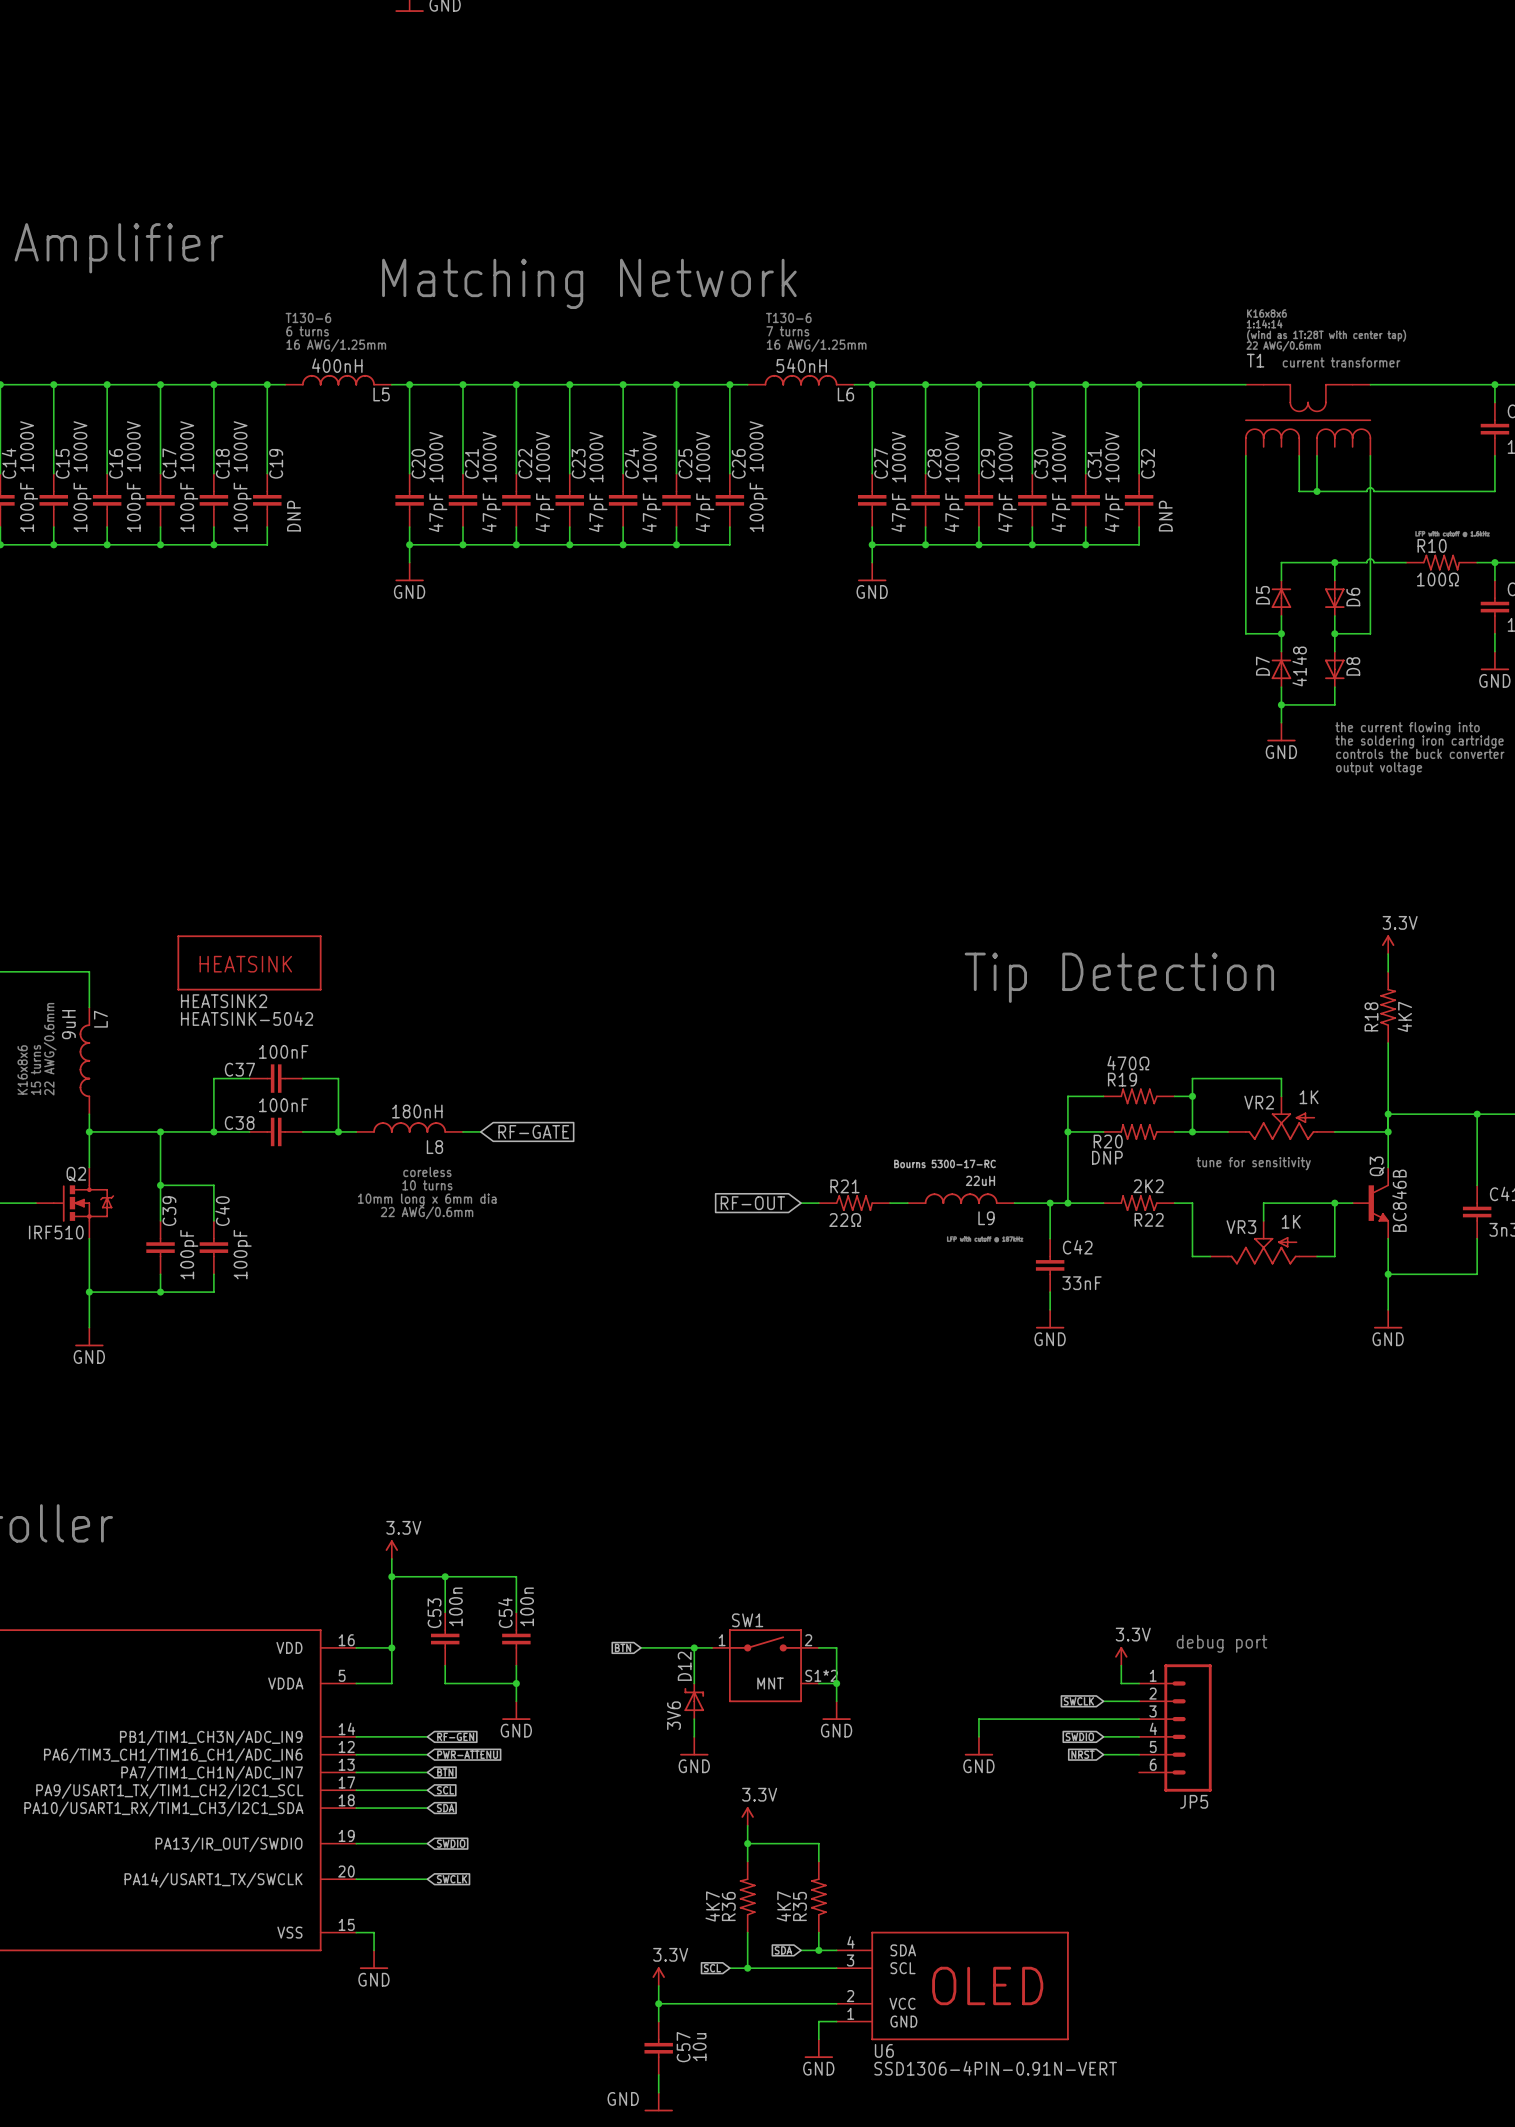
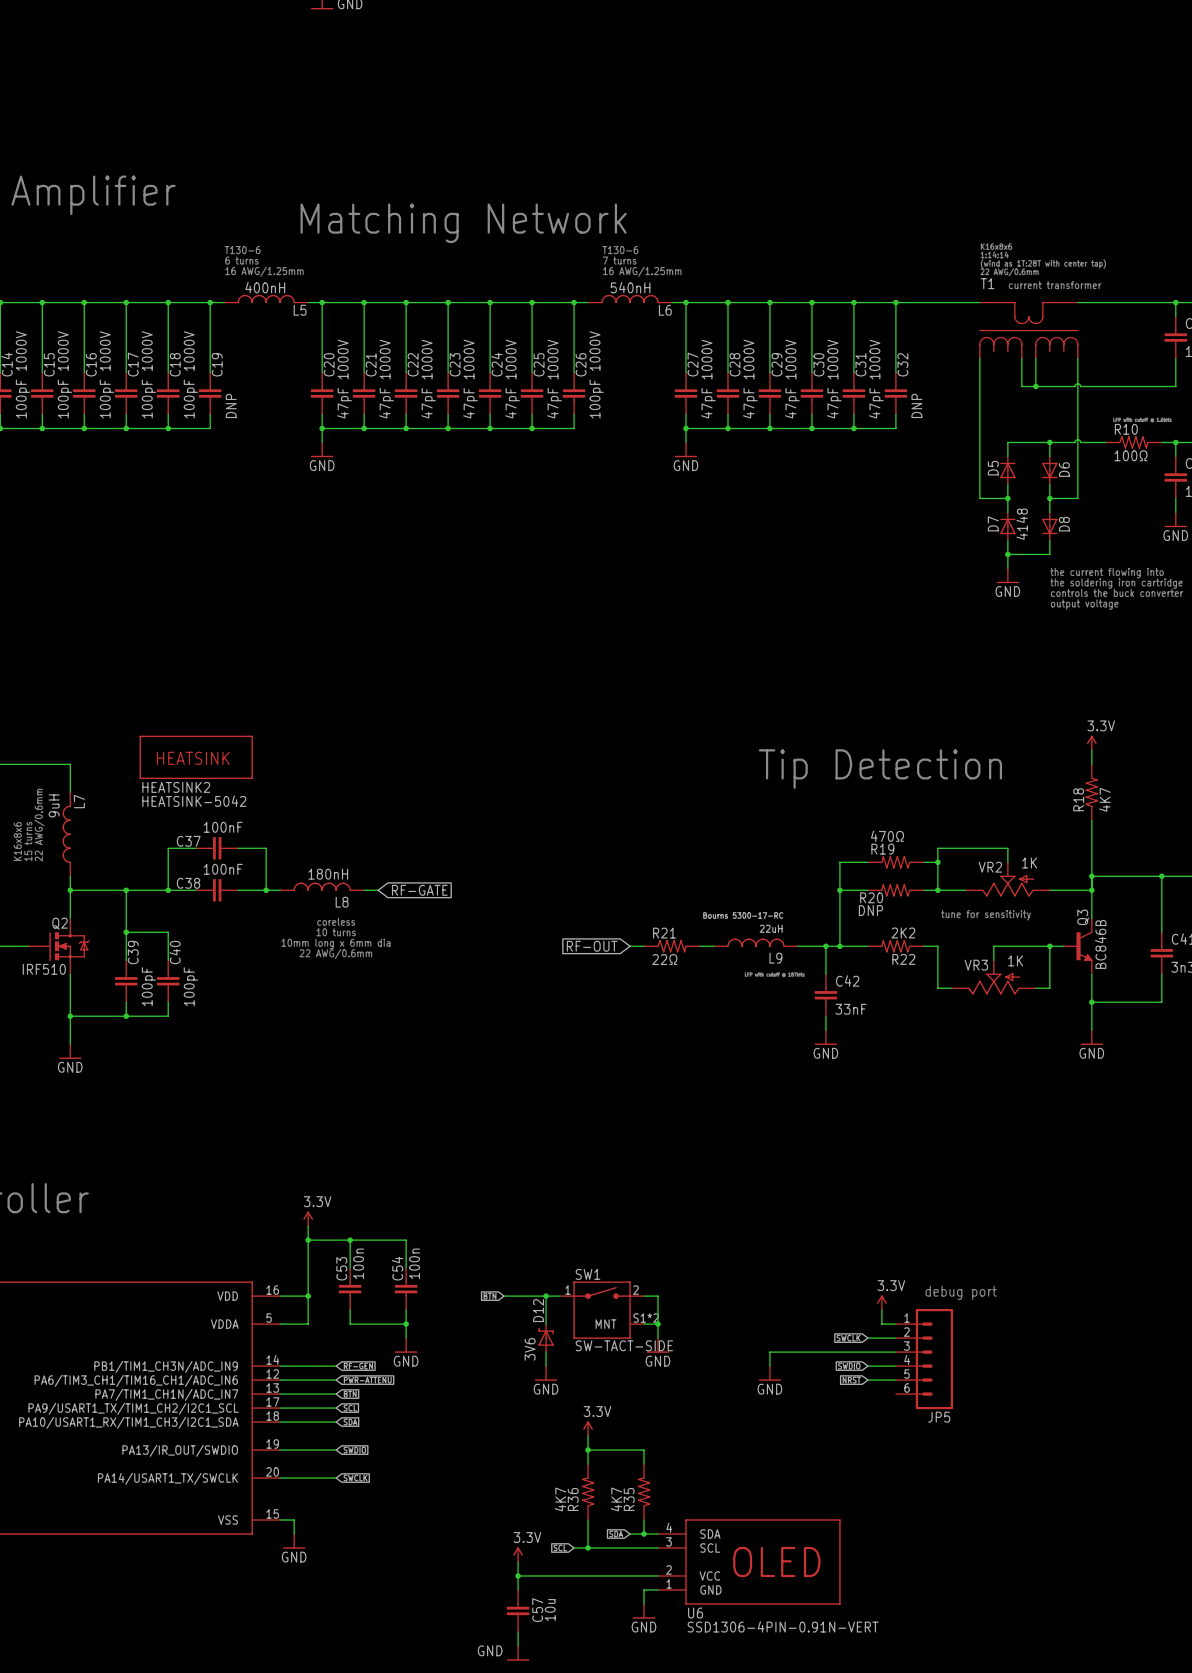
SW1 value: none -> SW-TACT-SIDE (624, 1345)

